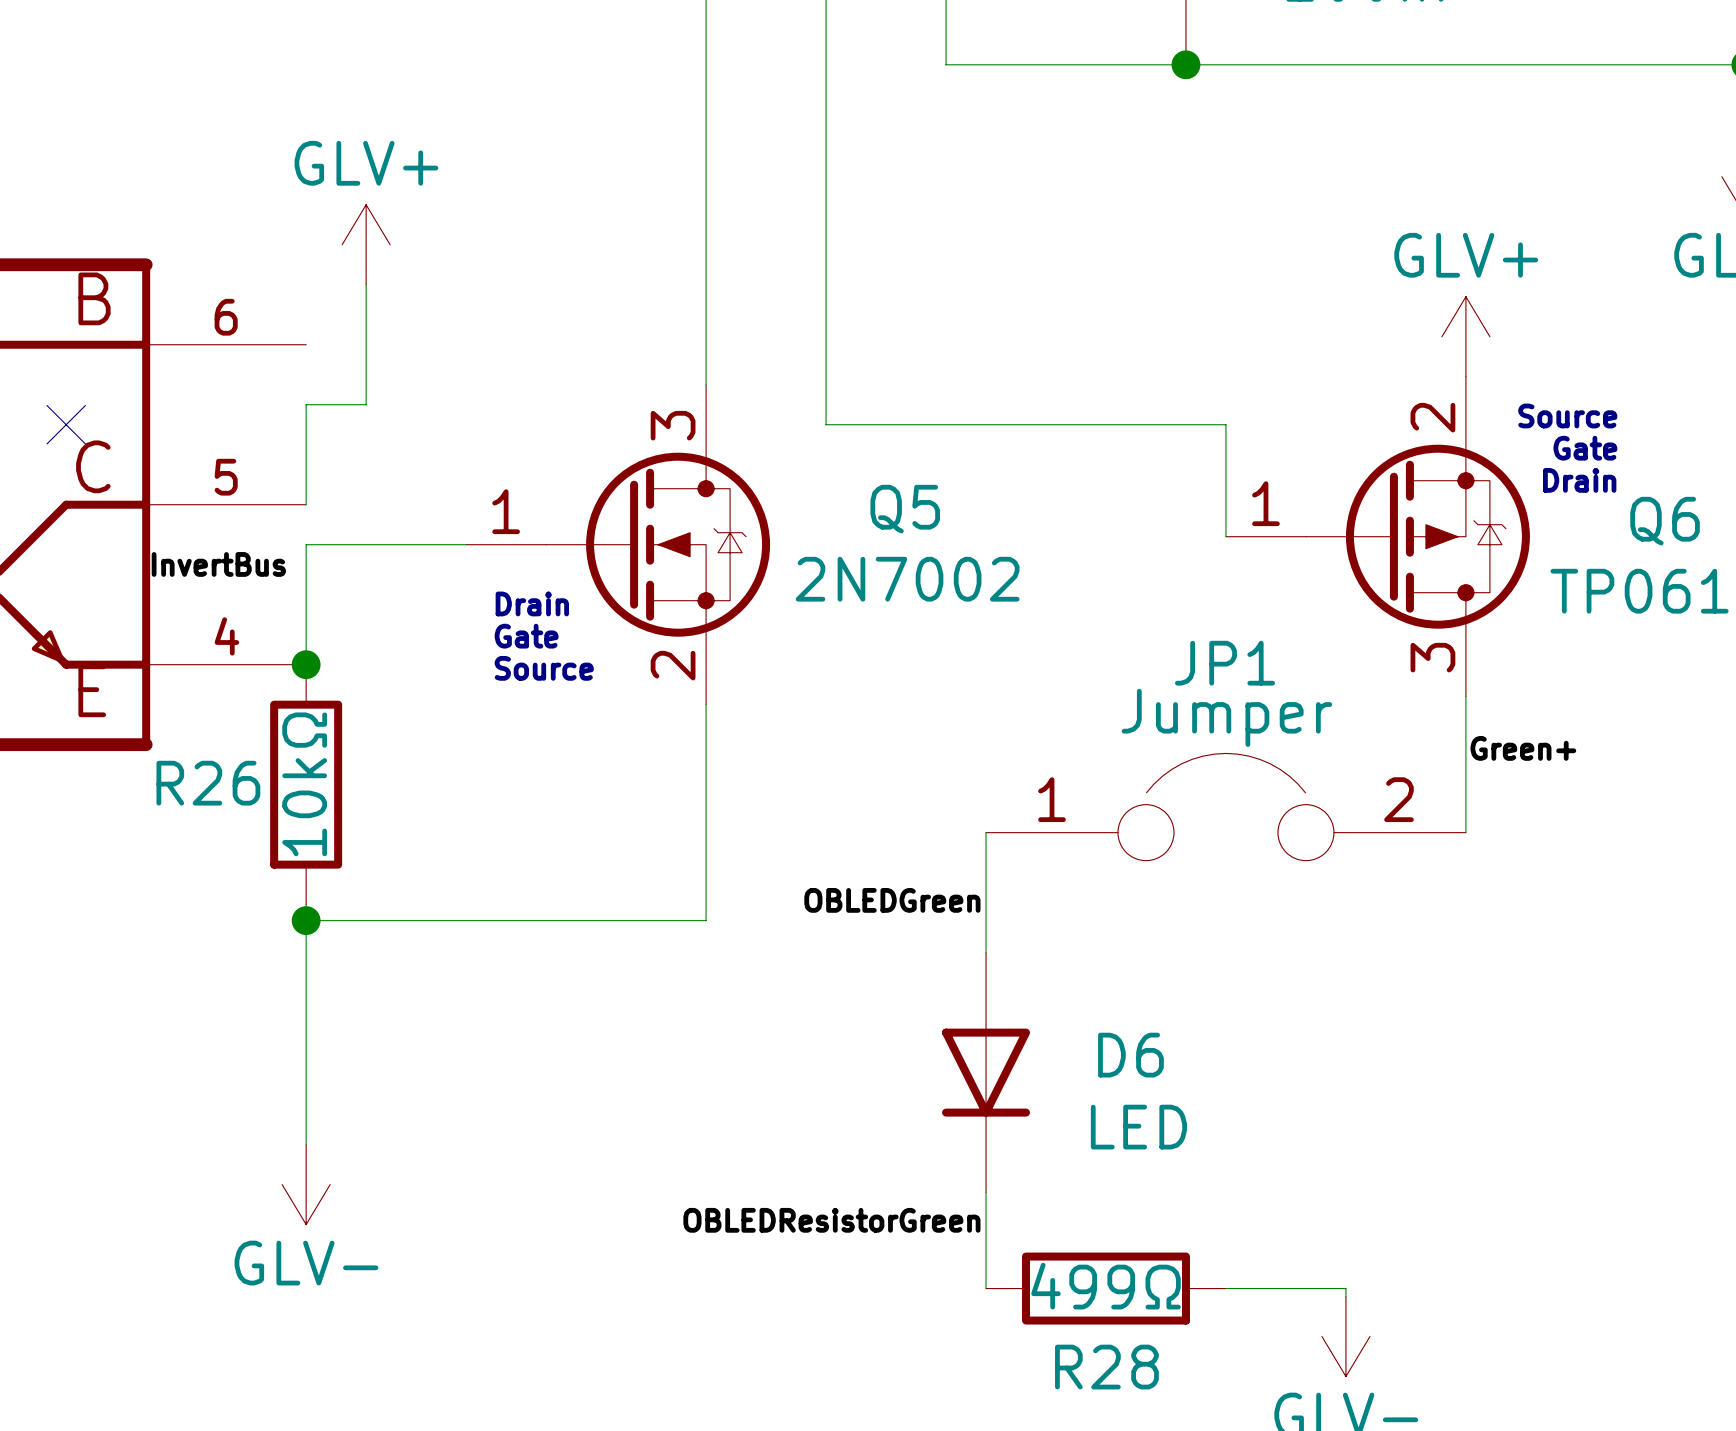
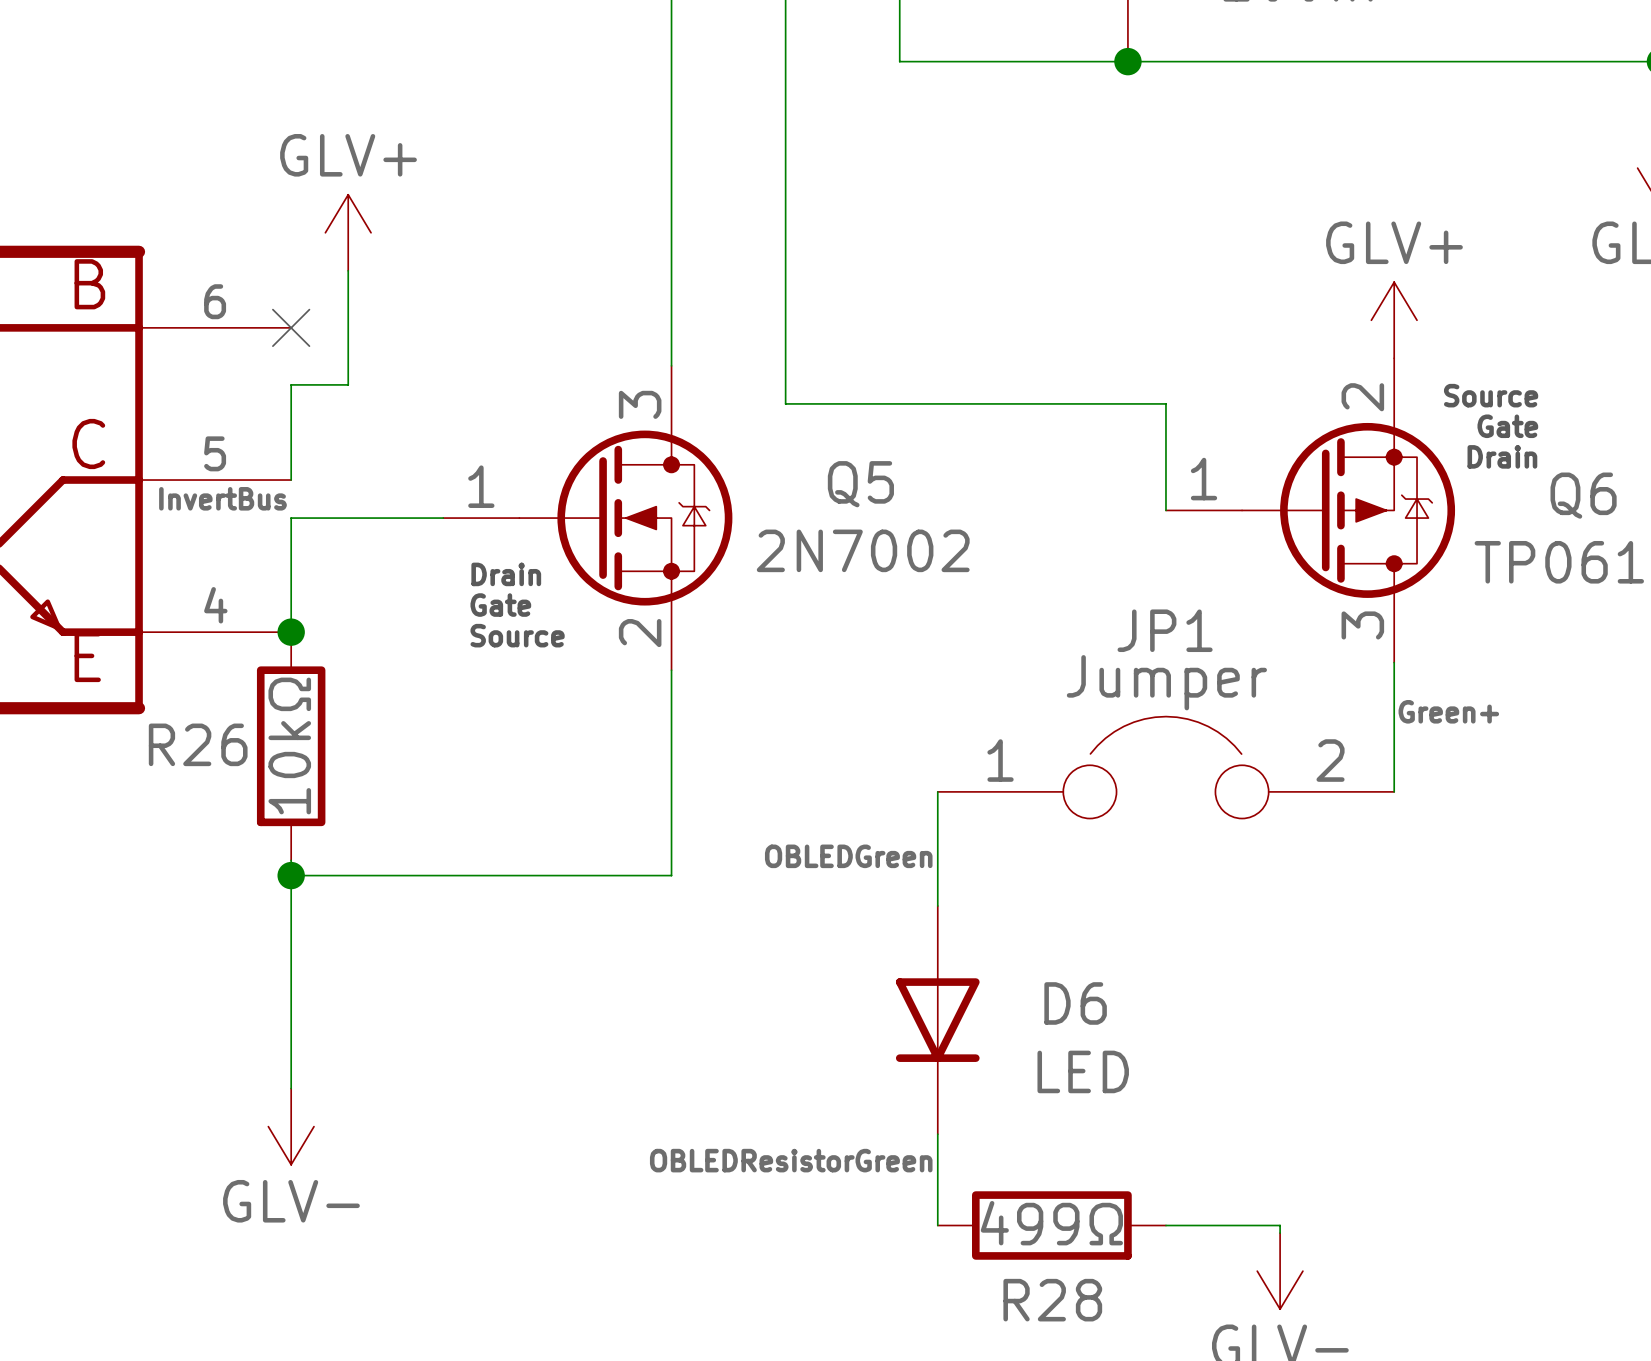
no-connect mark: none -> (291, 327)
no-connect mark: (66, 424) -> none
label position: InvertBus (218, 564) -> InvertBus (222, 498)

